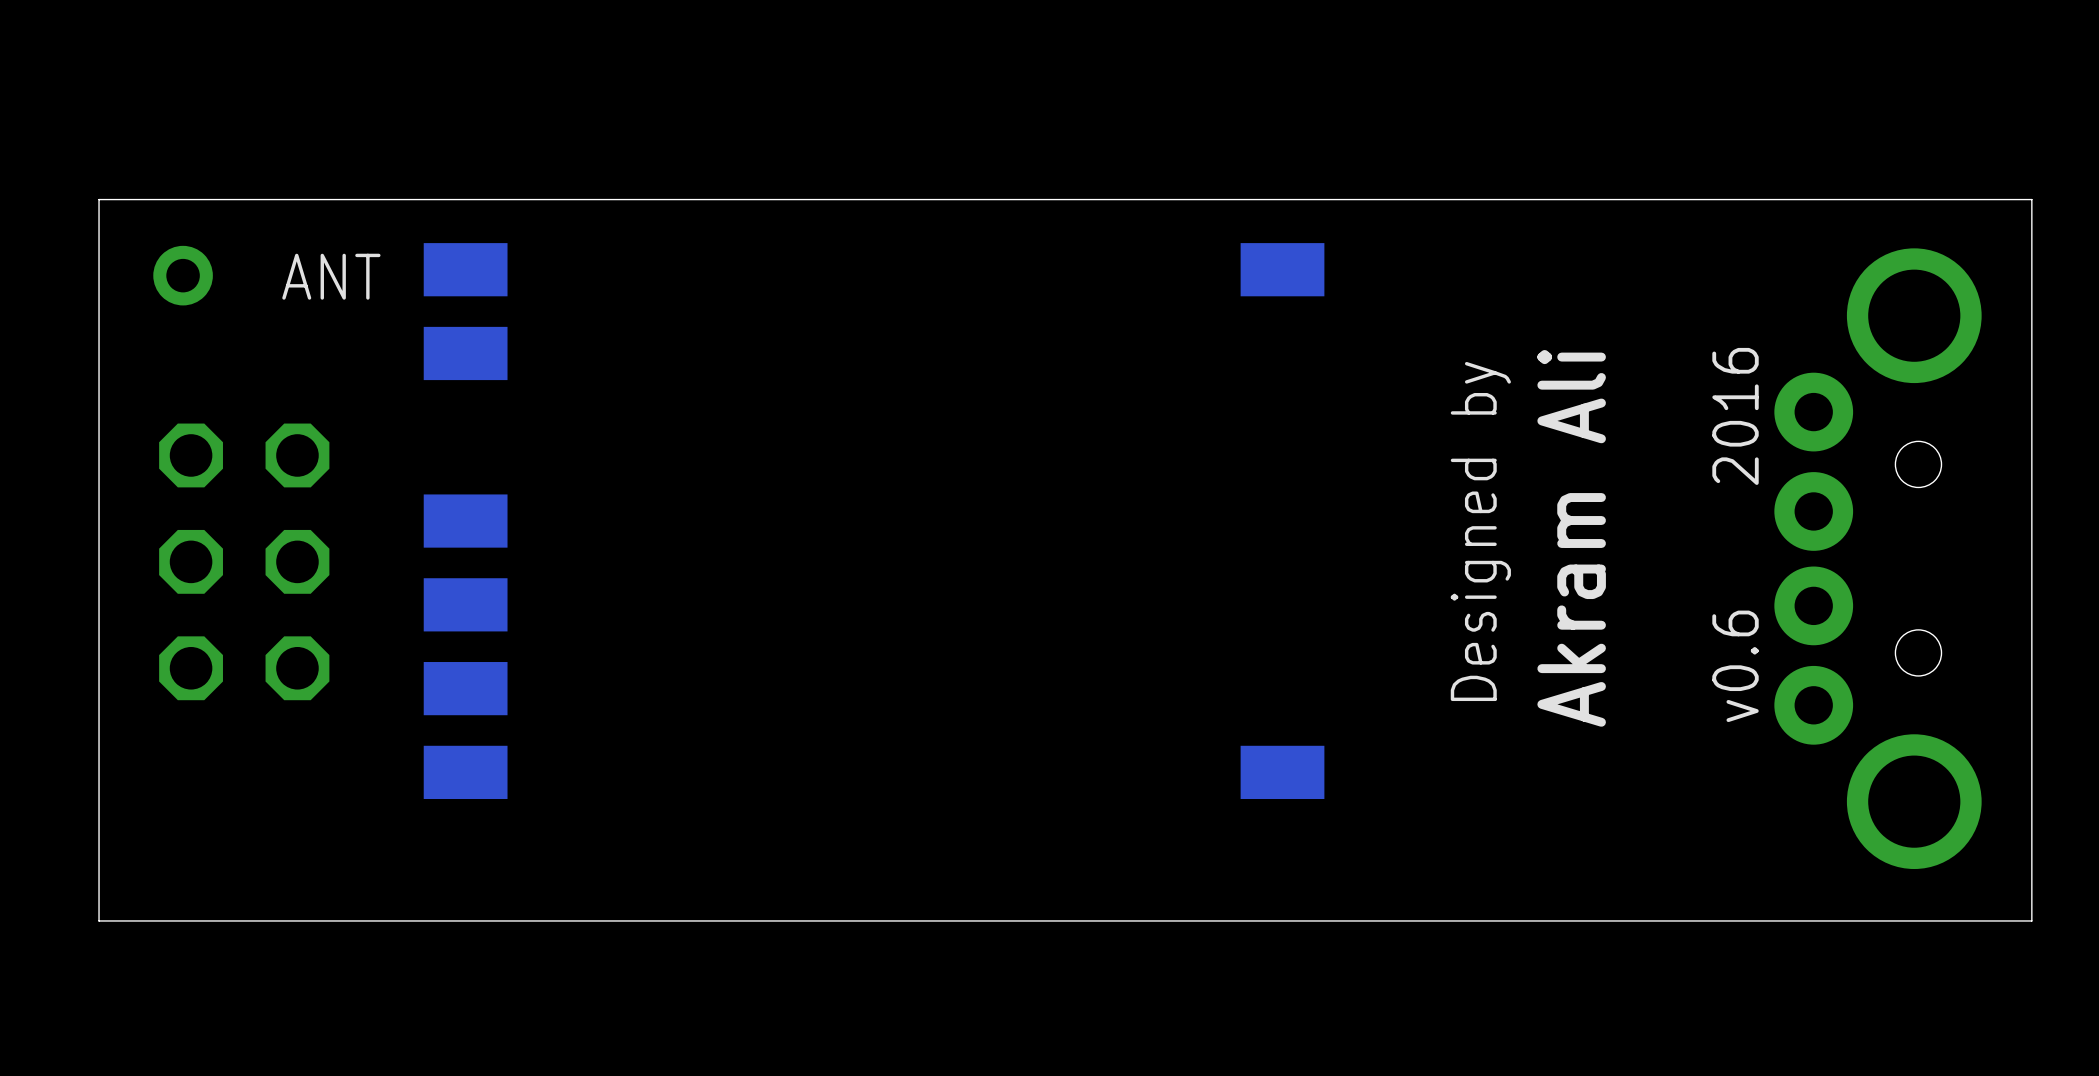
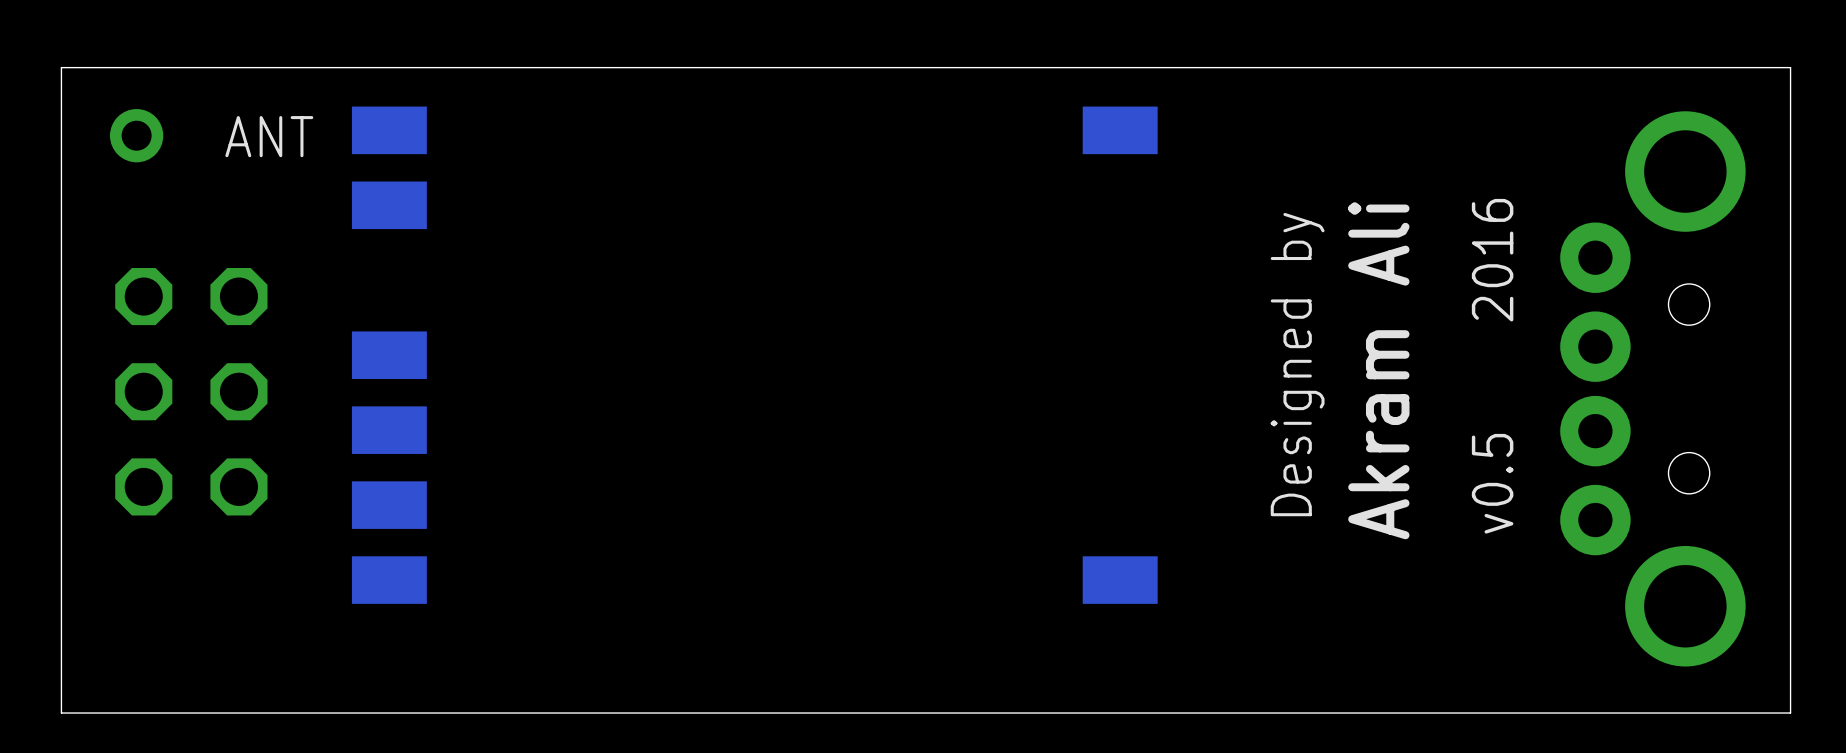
text: v0.6 2016 (1735, 534) -> v0.5 2016 (1492, 366)

